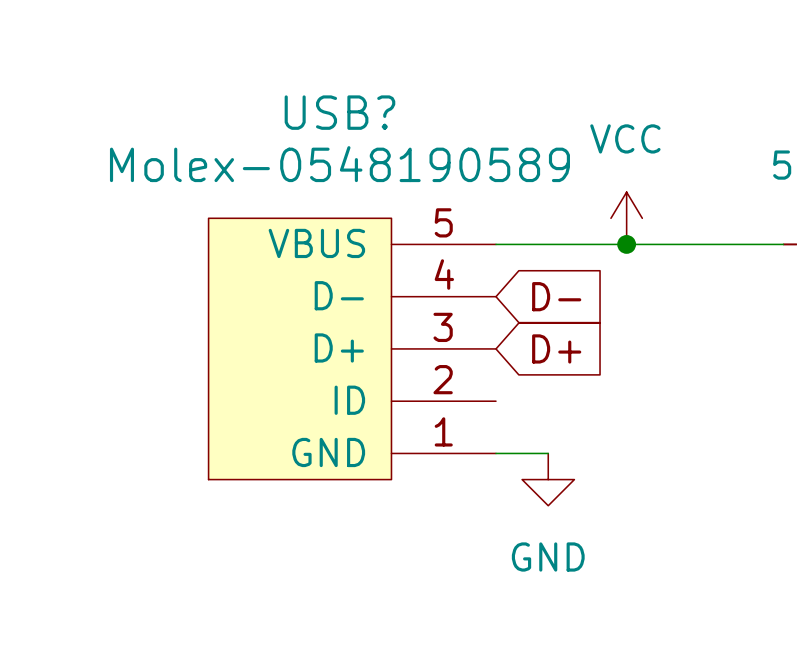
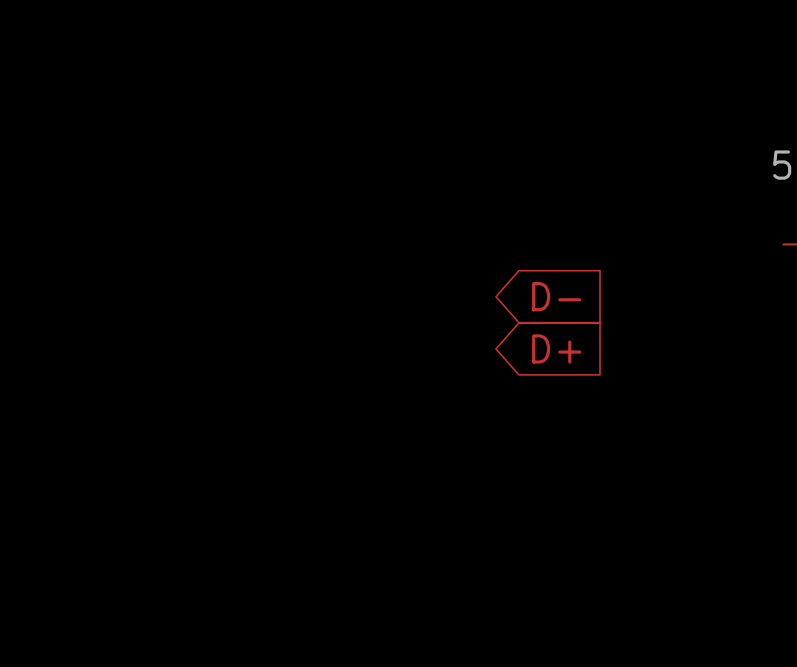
power symbol: VCC (626, 218) -> none
wire: (495, 244) (783, 244) -> none
junction: (626, 244) -> none
USB?: Molex-0548190589 (352, 348) -> none
wire: (495, 453) (548, 453) -> none
power symbol: GND (548, 479) -> none

